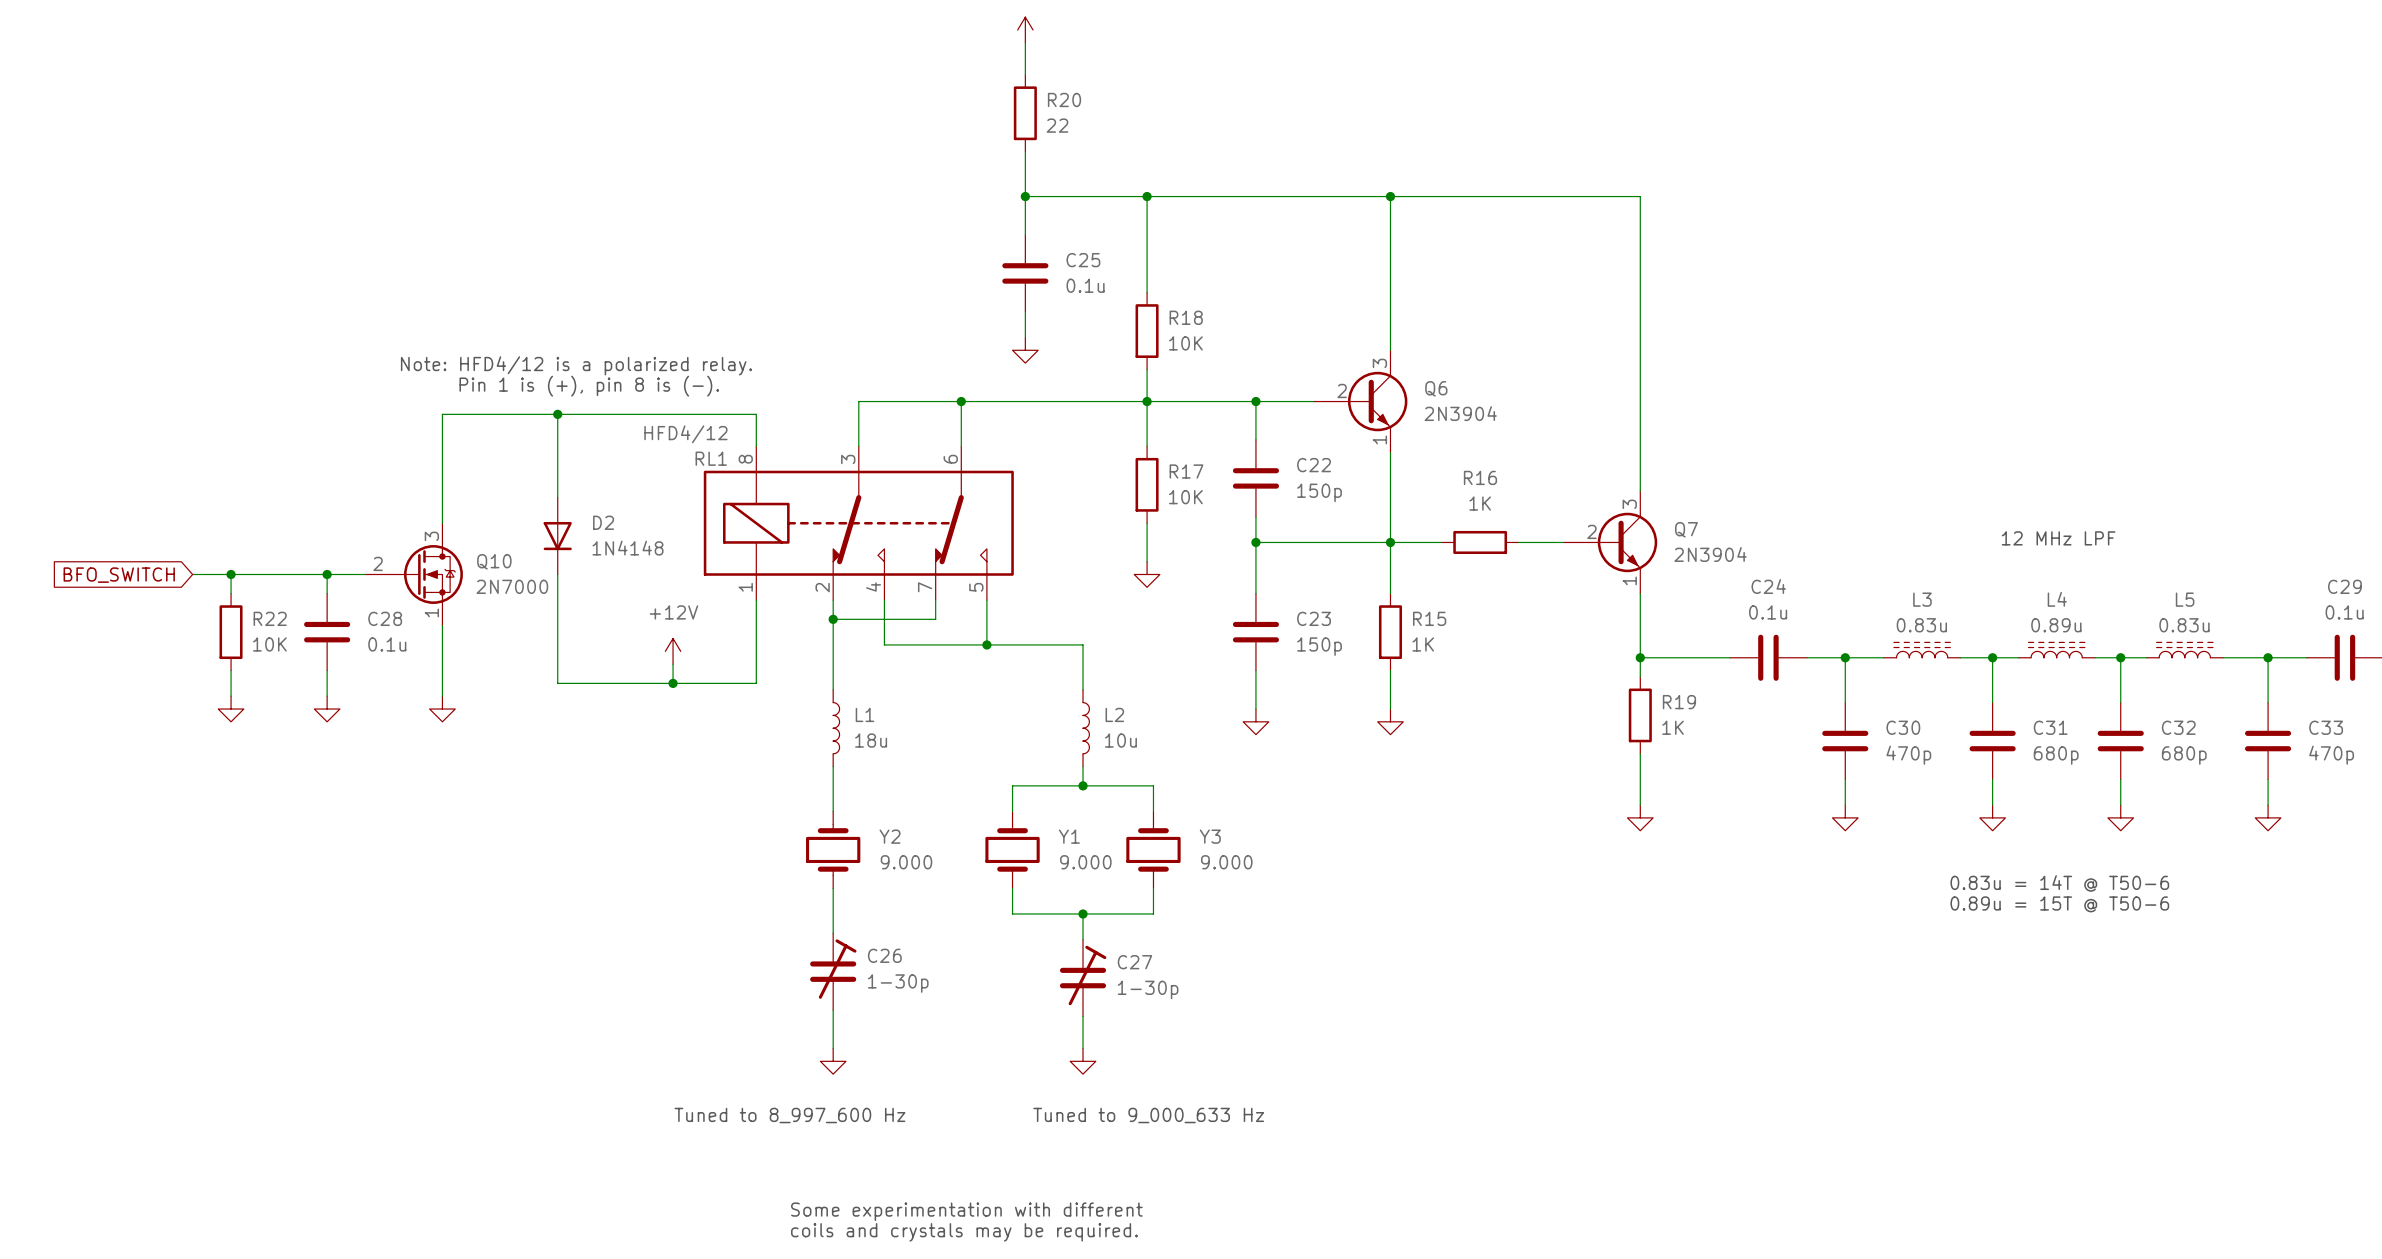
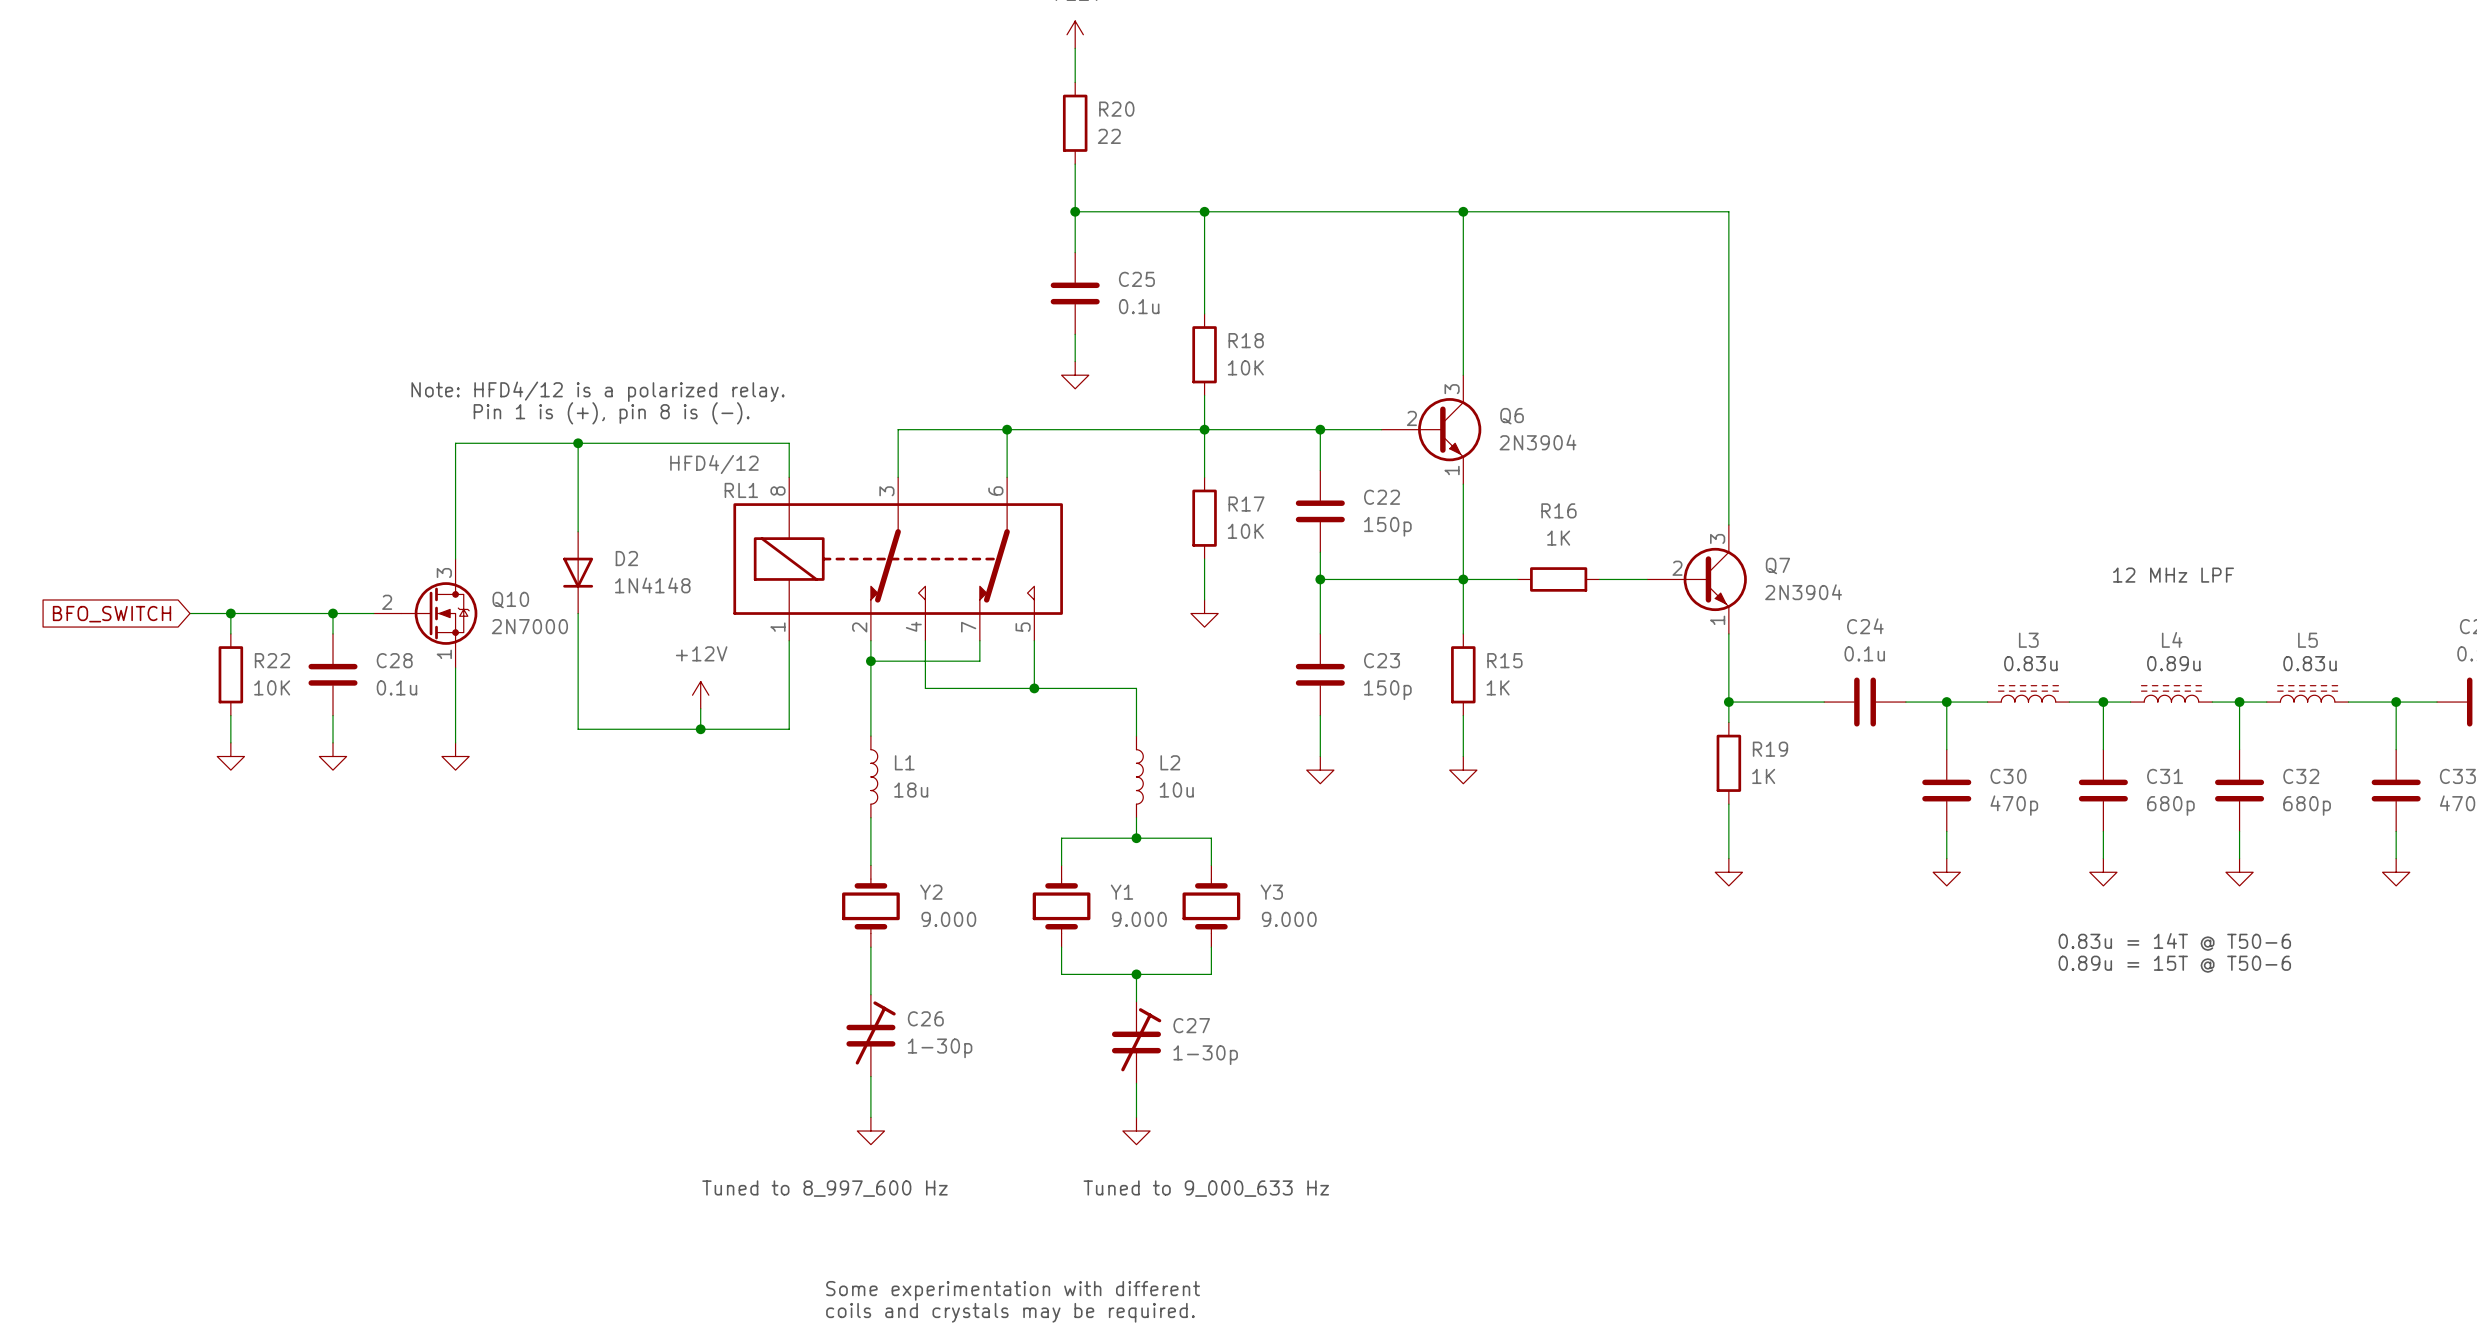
text: none -> 0.83u (2030, 663)
text: none -> 0.89u (2173, 663)
text: none -> 0.83u (2310, 663)
L3 value: 0.83u (1921, 625) -> none
L4 value: 0.89u (2056, 625) -> none
L5 value: 0.83u (2184, 625) -> none

